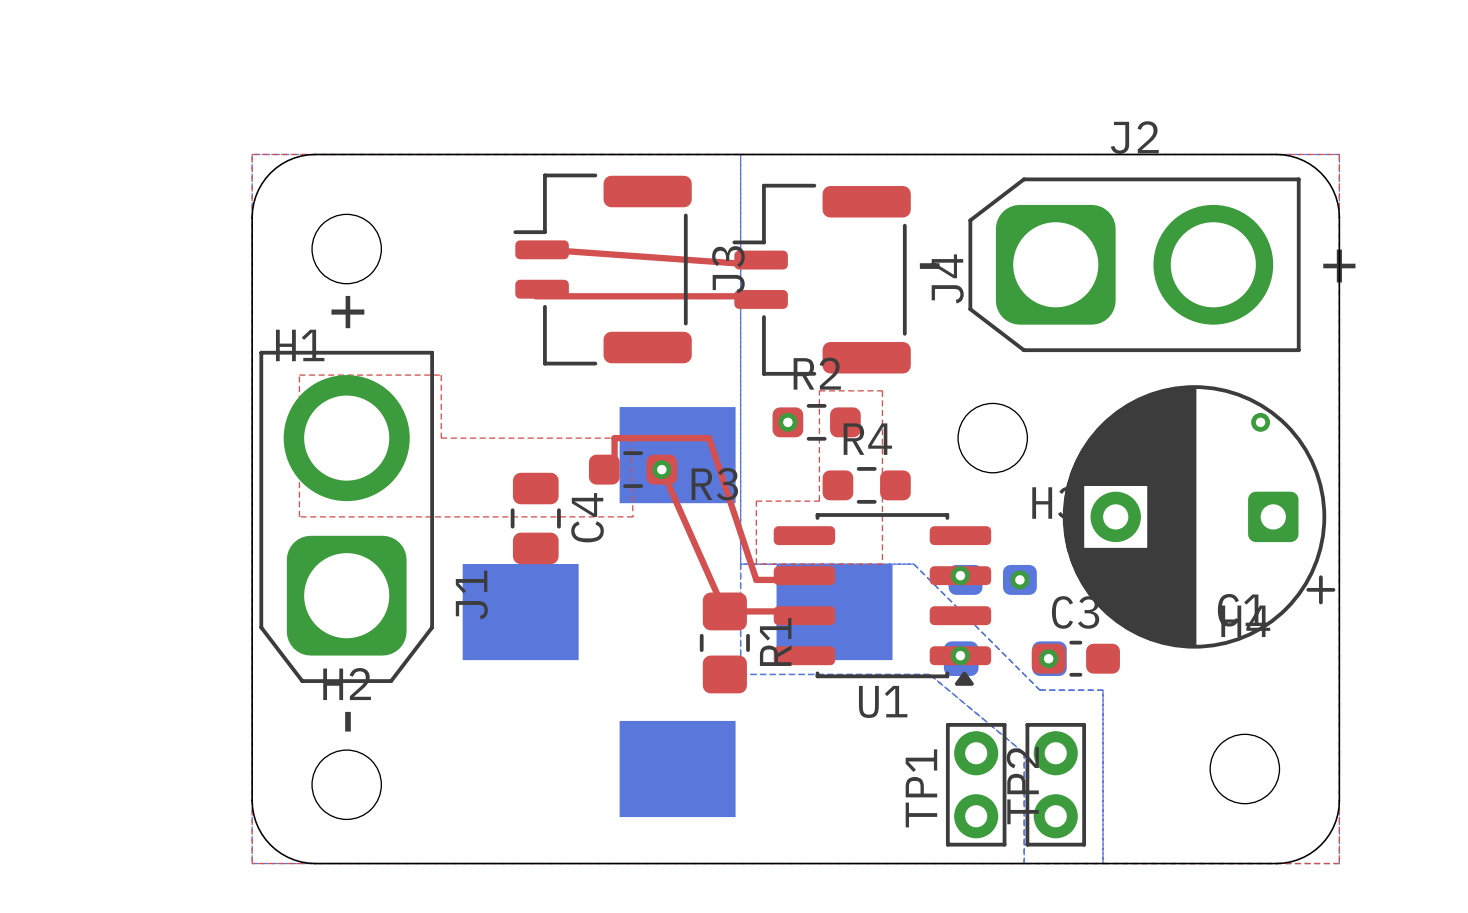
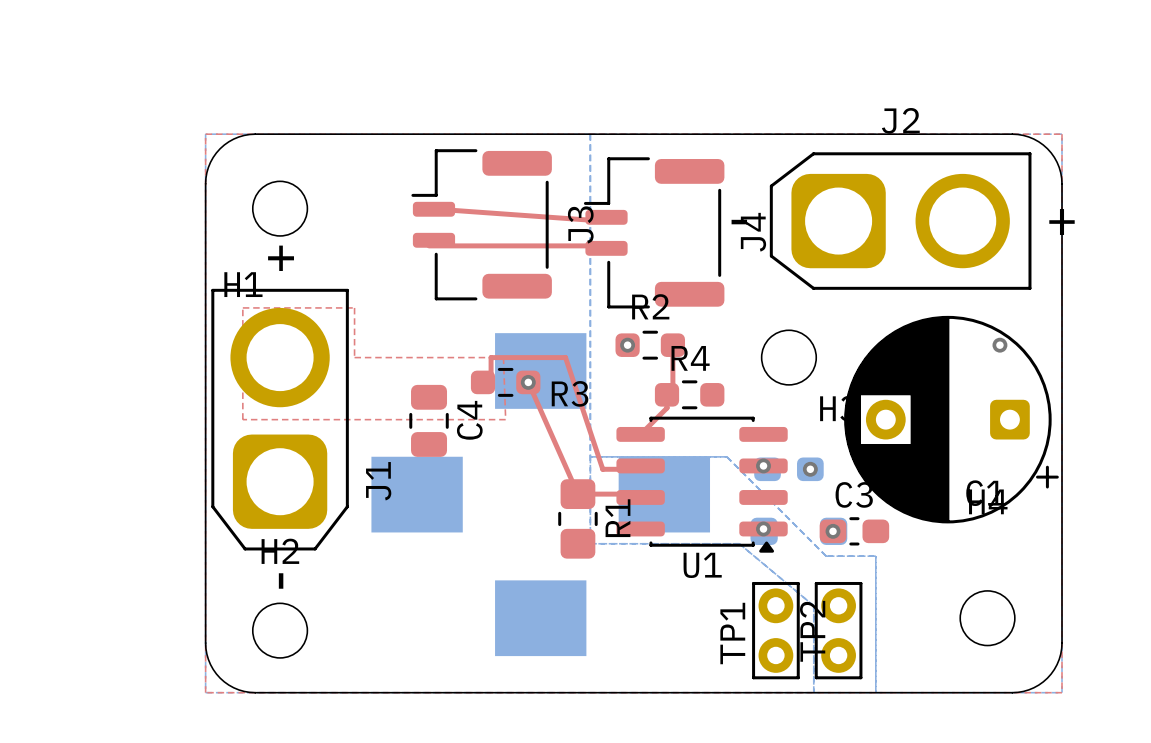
top zone outline: (819, 390) (882, 390) (882, 564) (756, 564) (756, 501) (819, 501) (819, 390) -> none
top track: none -> (672, 345) (672, 388) (667, 394) (667, 408) (640, 434)

